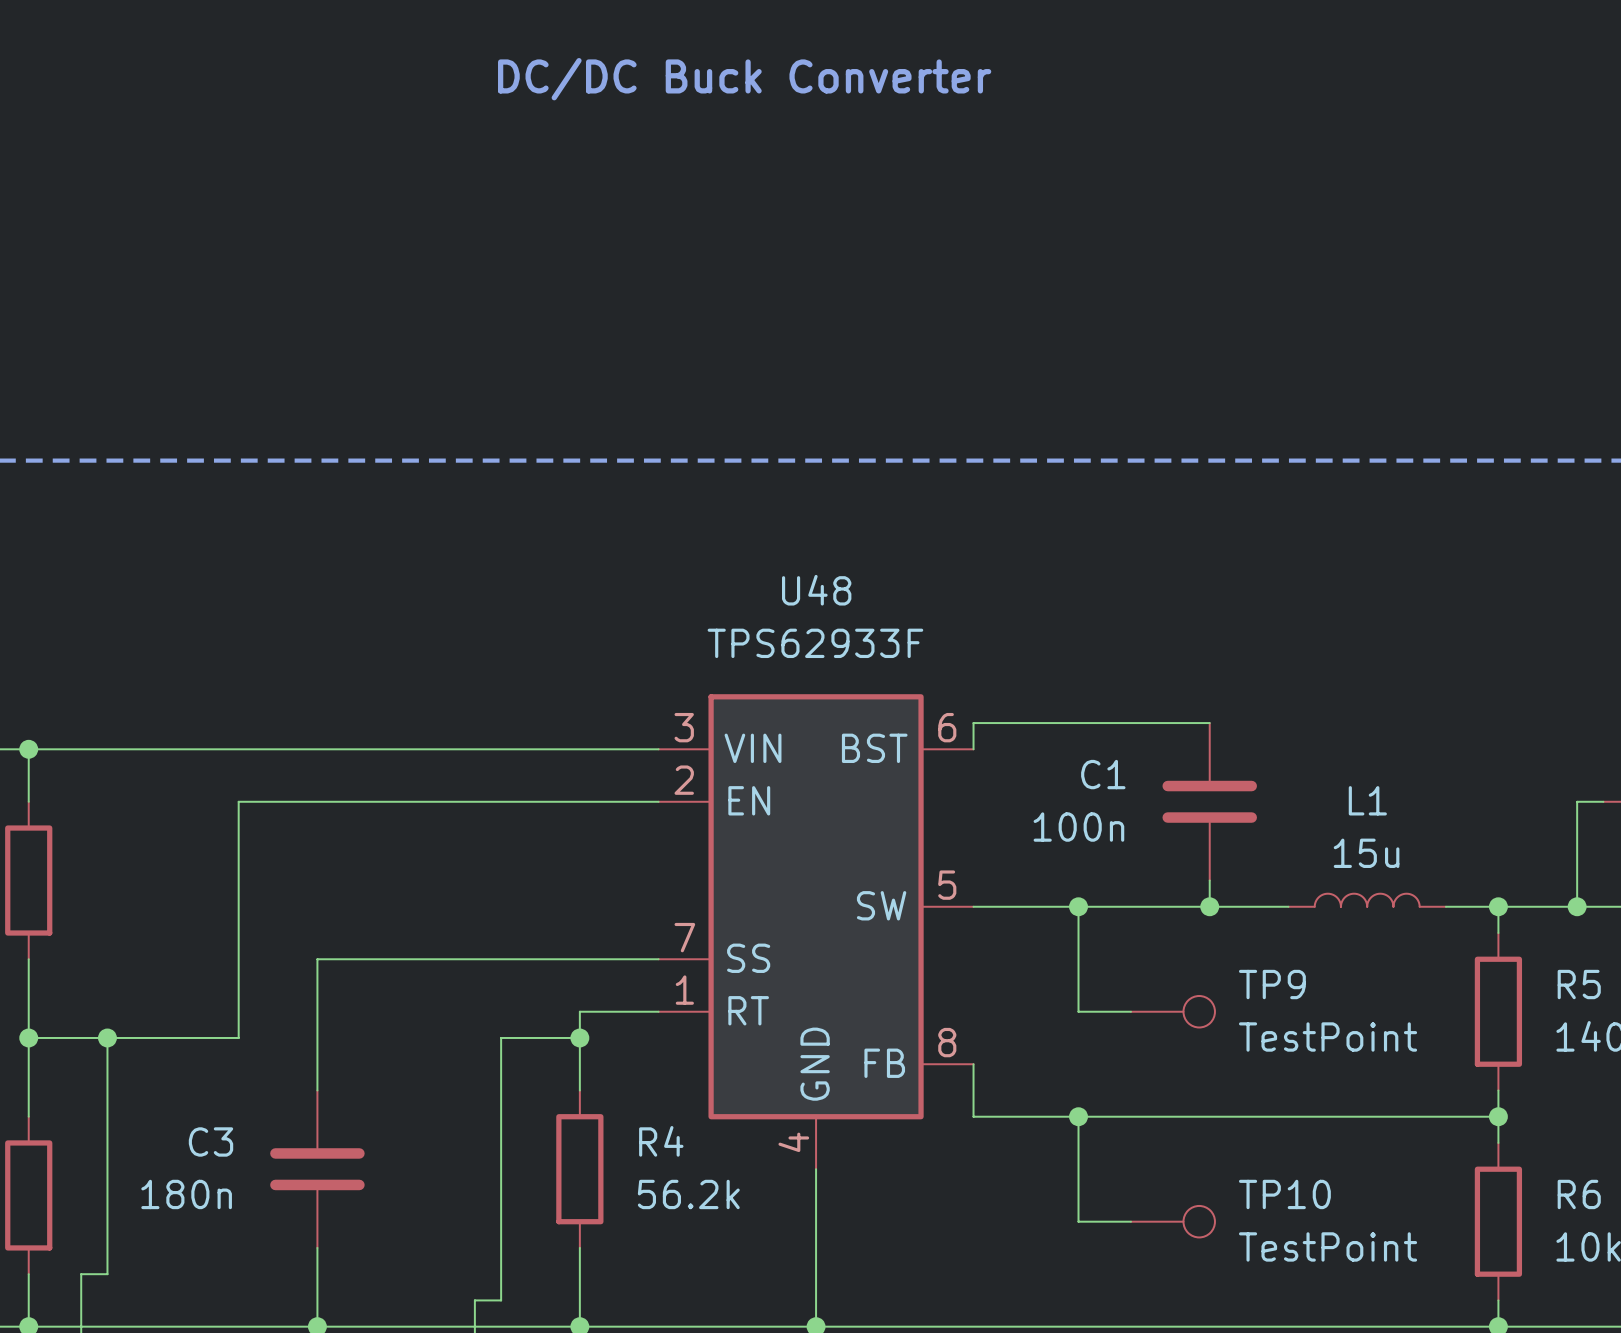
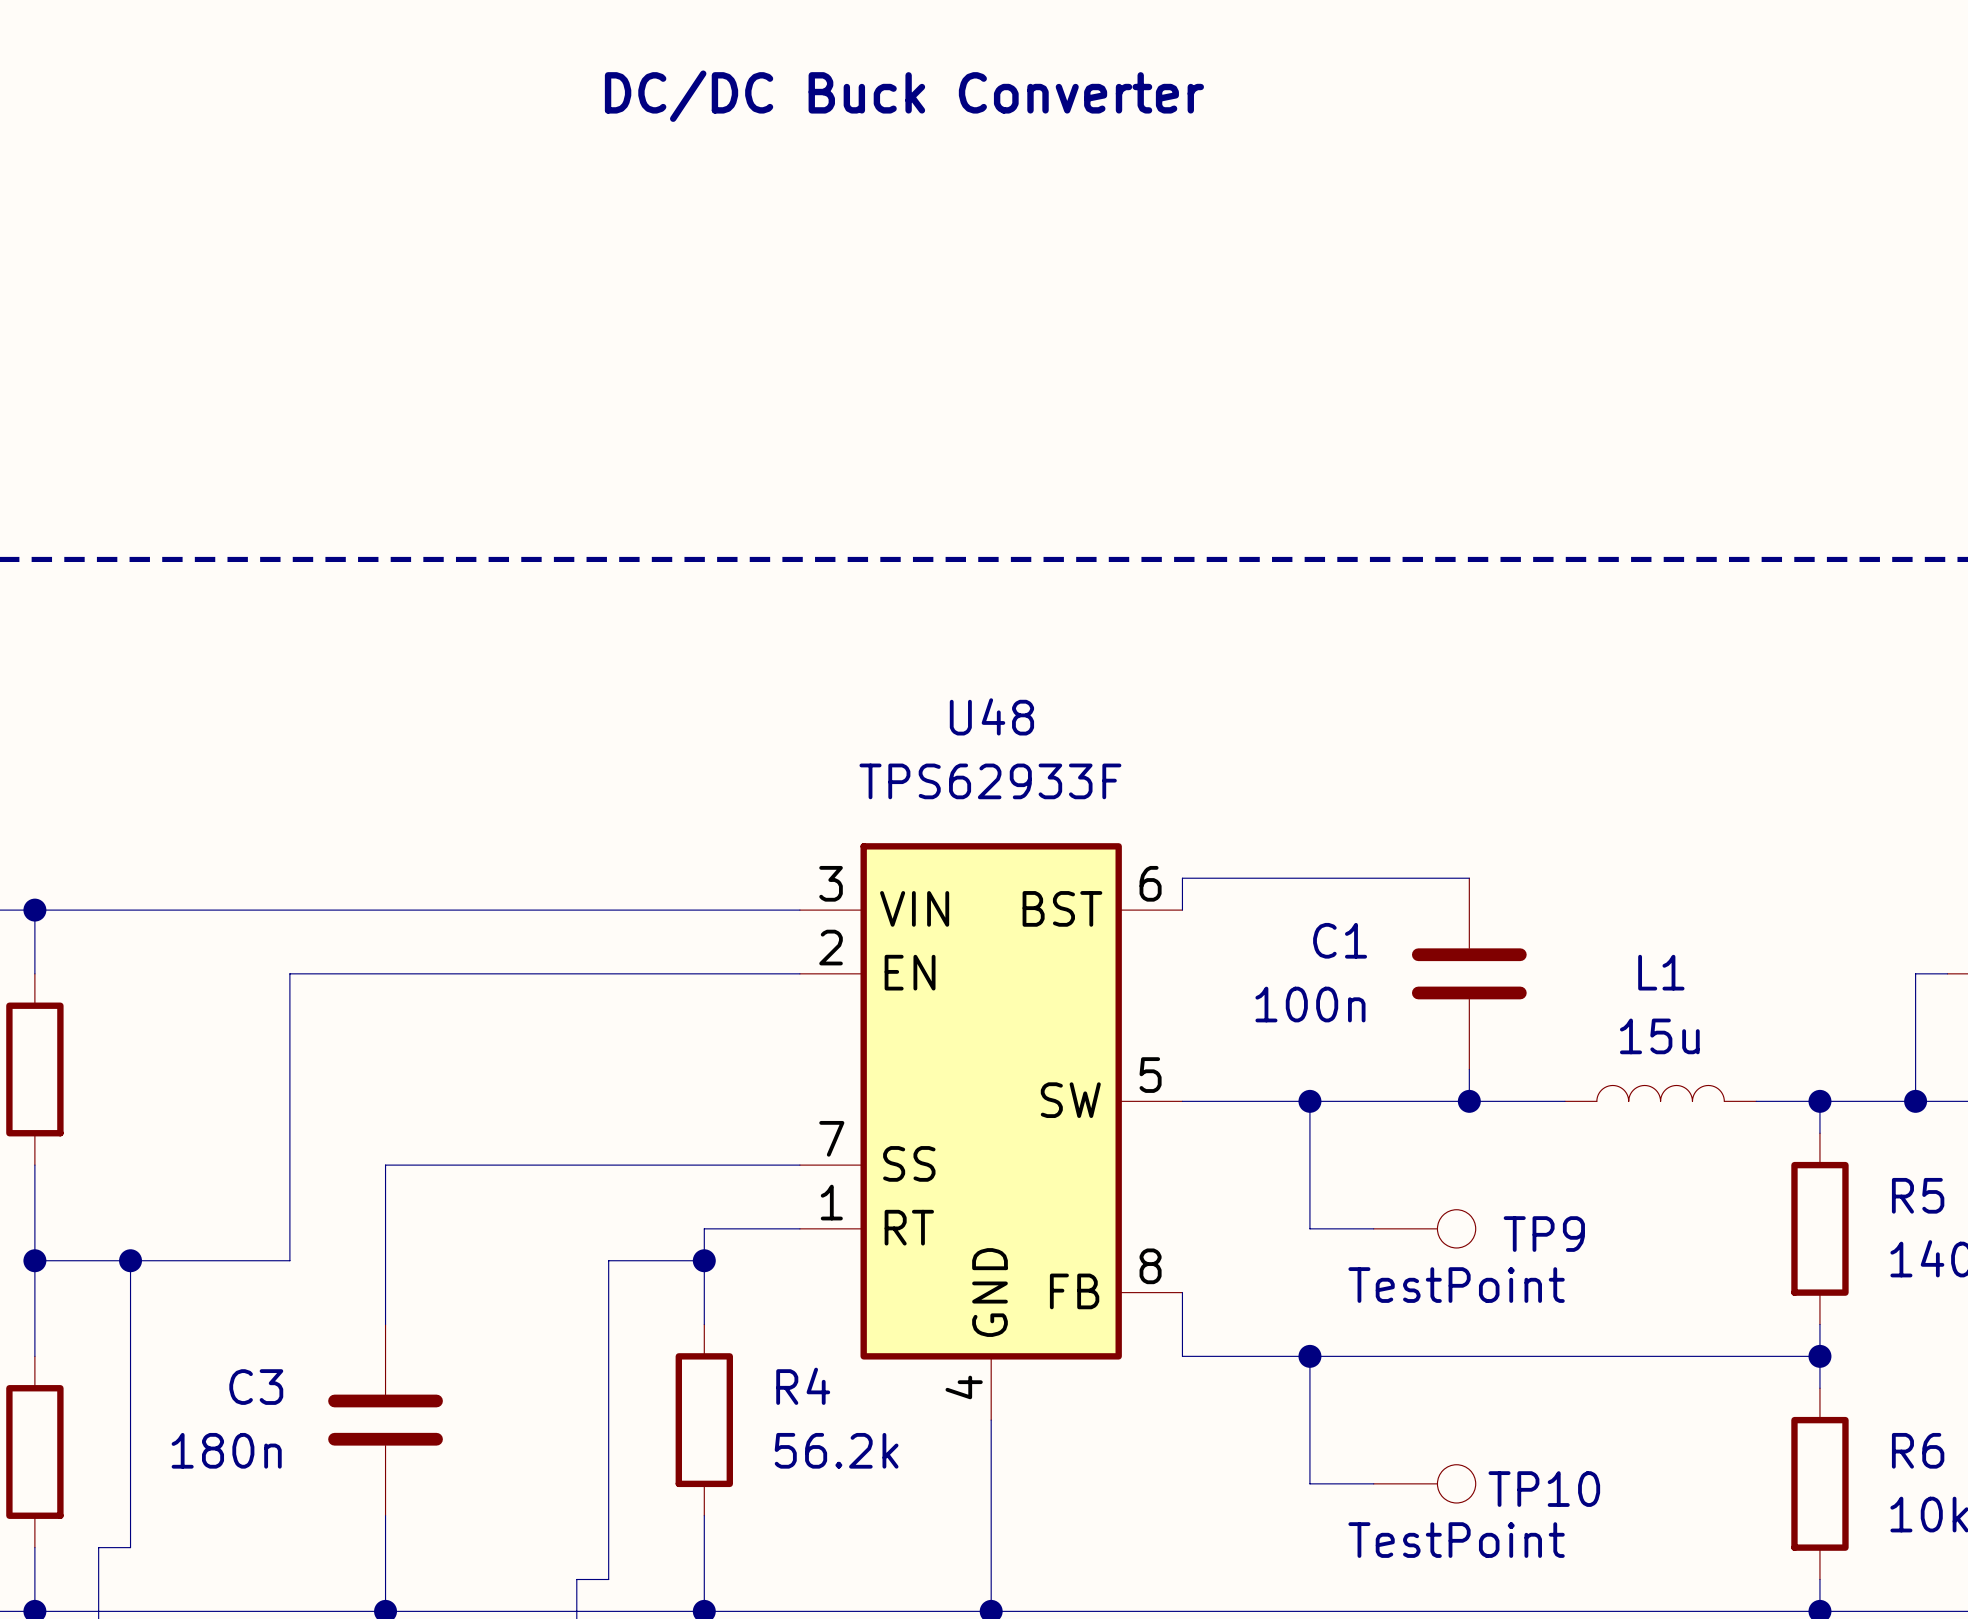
TP9 name position: TP9 (1272, 984) -> TP9 (1544, 1234)
TP9 value position: TestPoint (1328, 1037) -> TestPoint (1456, 1285)
TP10 name position: TP10 (1284, 1194) -> TP10 (1544, 1489)
TP10 value position: TestPoint (1328, 1246) -> TestPoint (1456, 1540)

